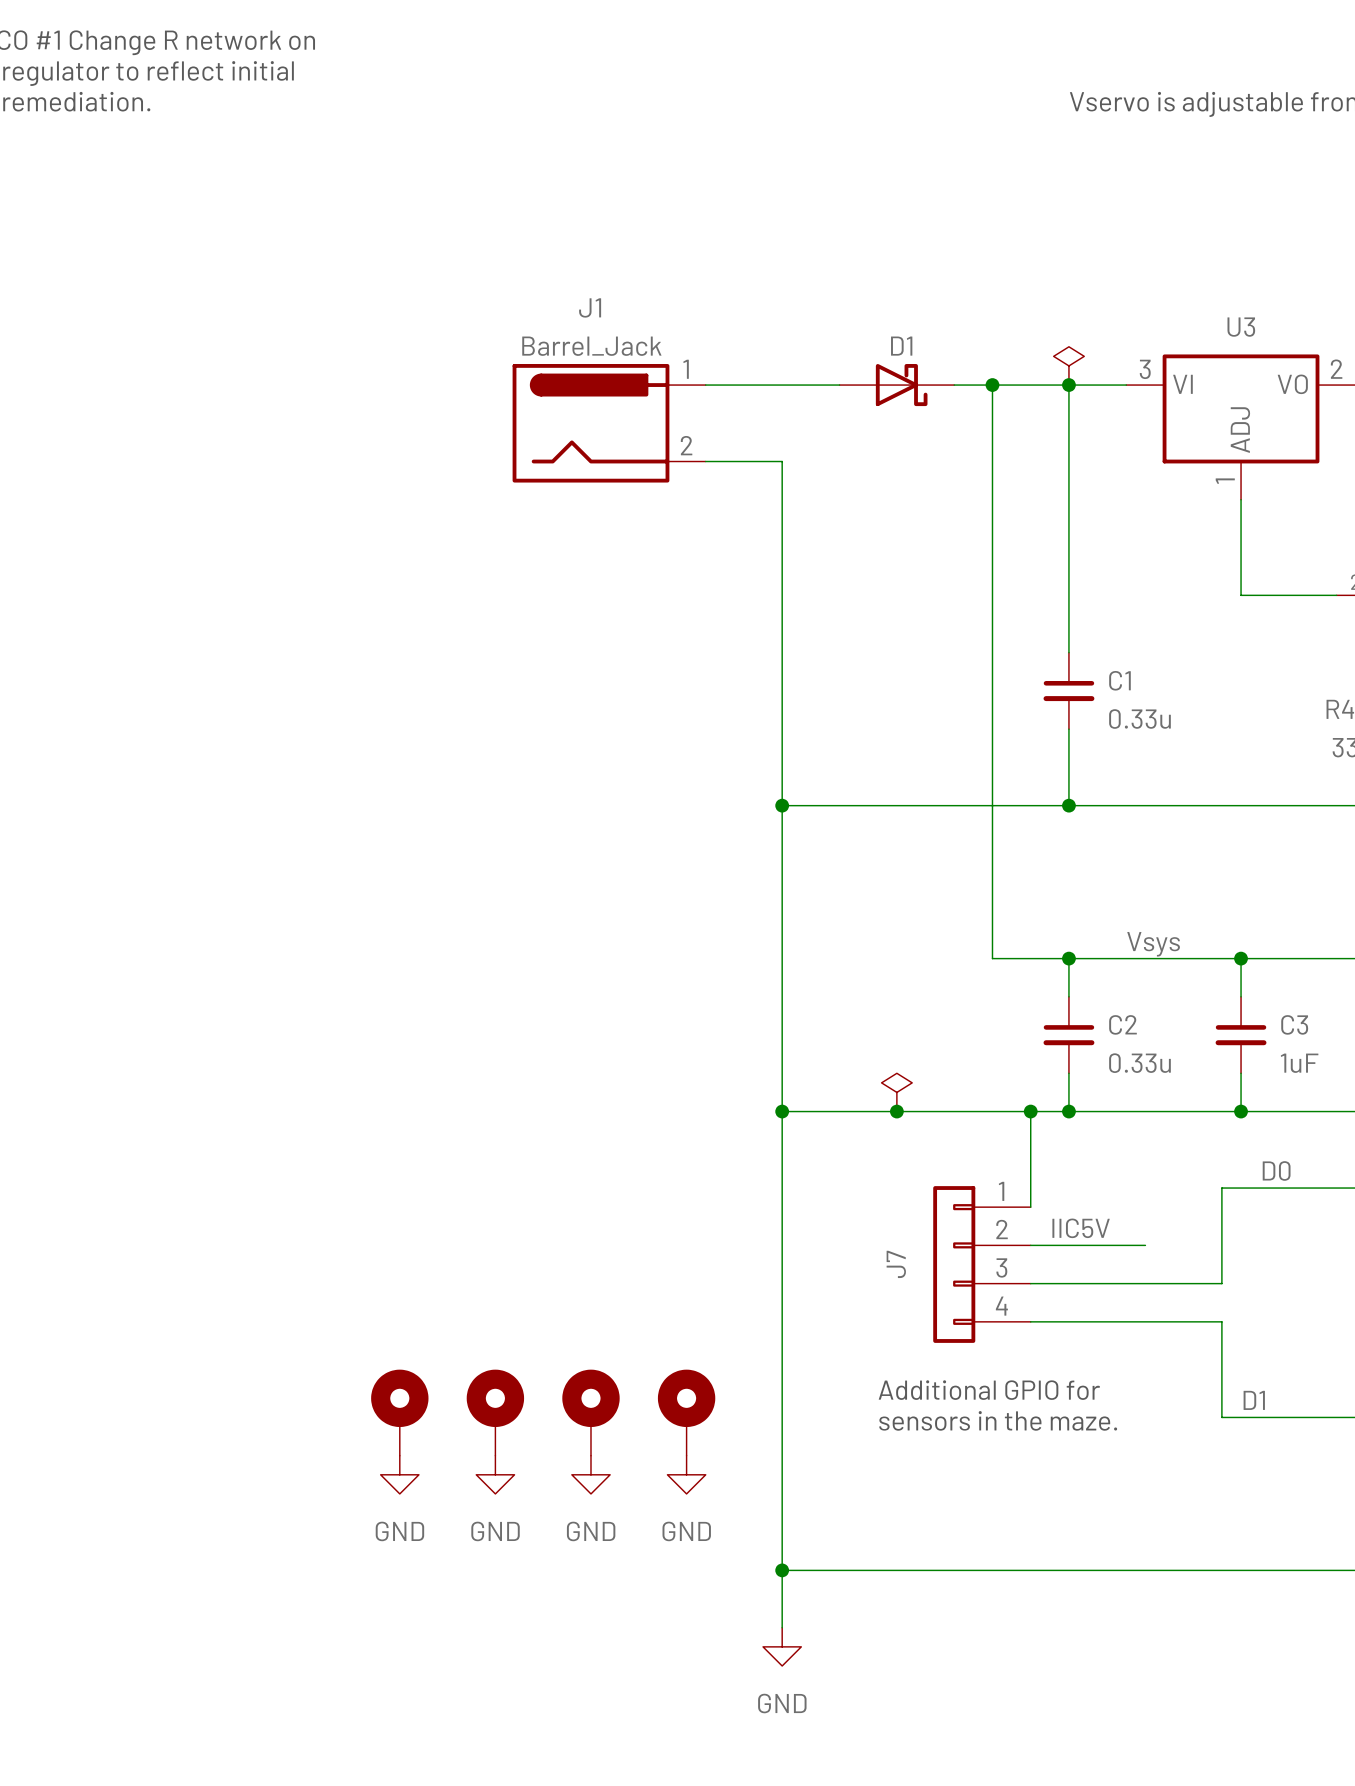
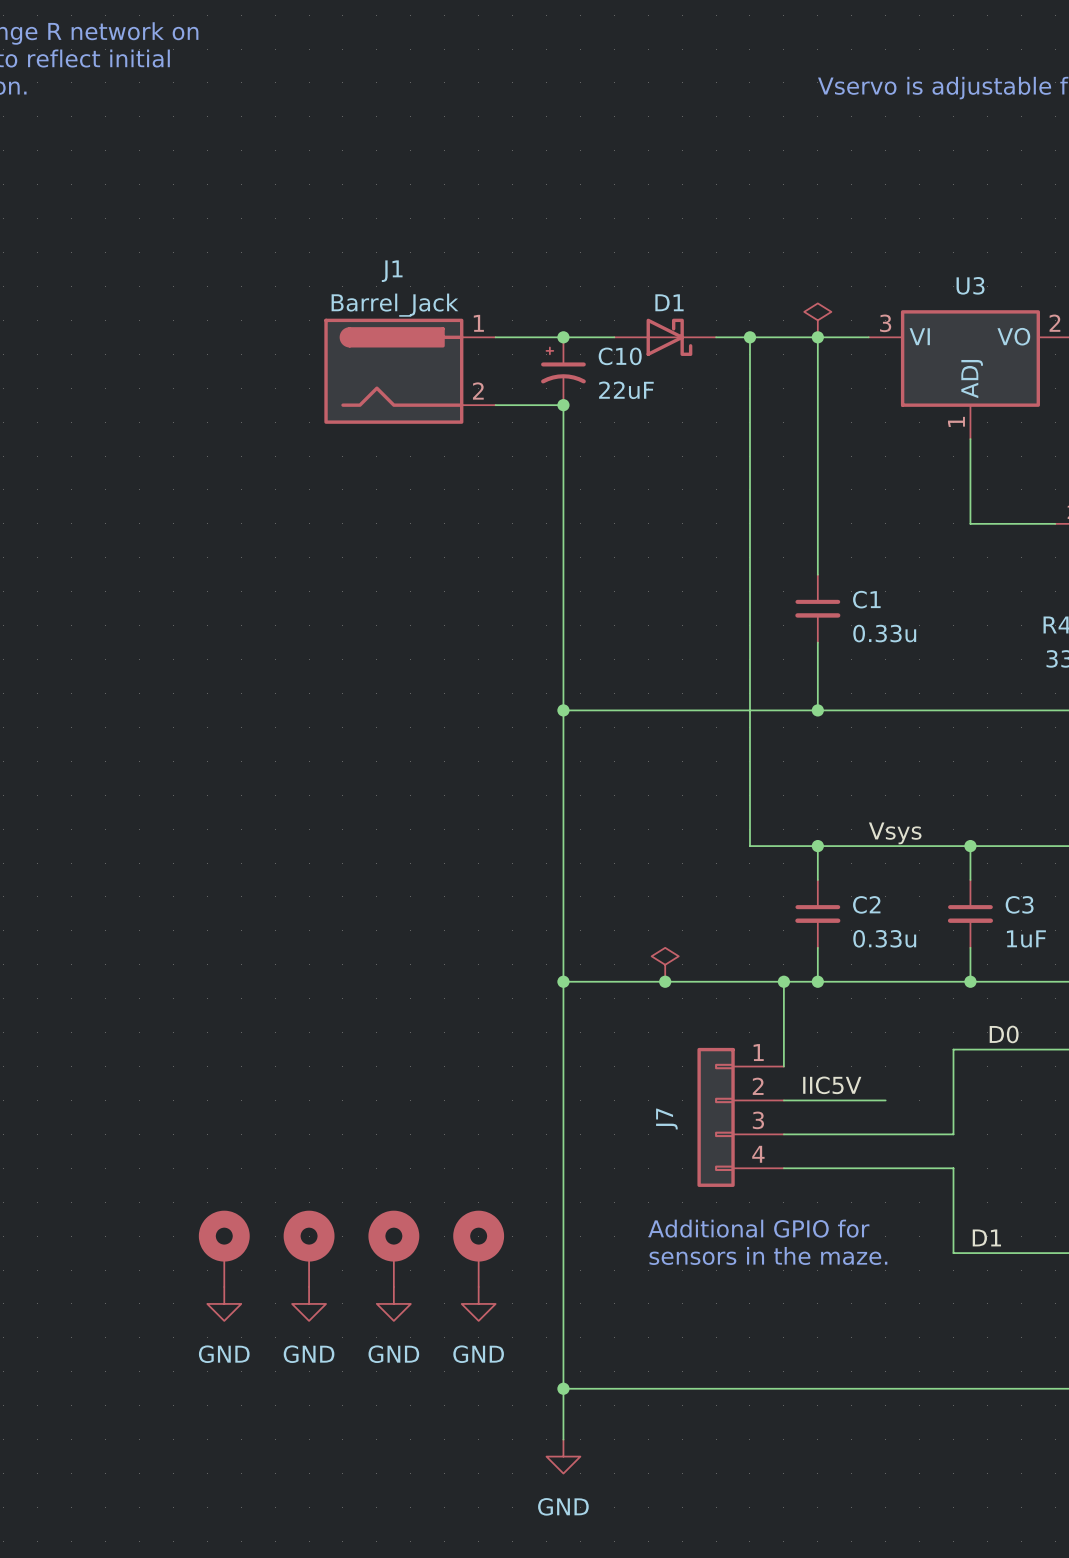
junction: none -> (563, 337)
C10: none -> 22uF (563, 371)
junction: none -> (563, 405)

